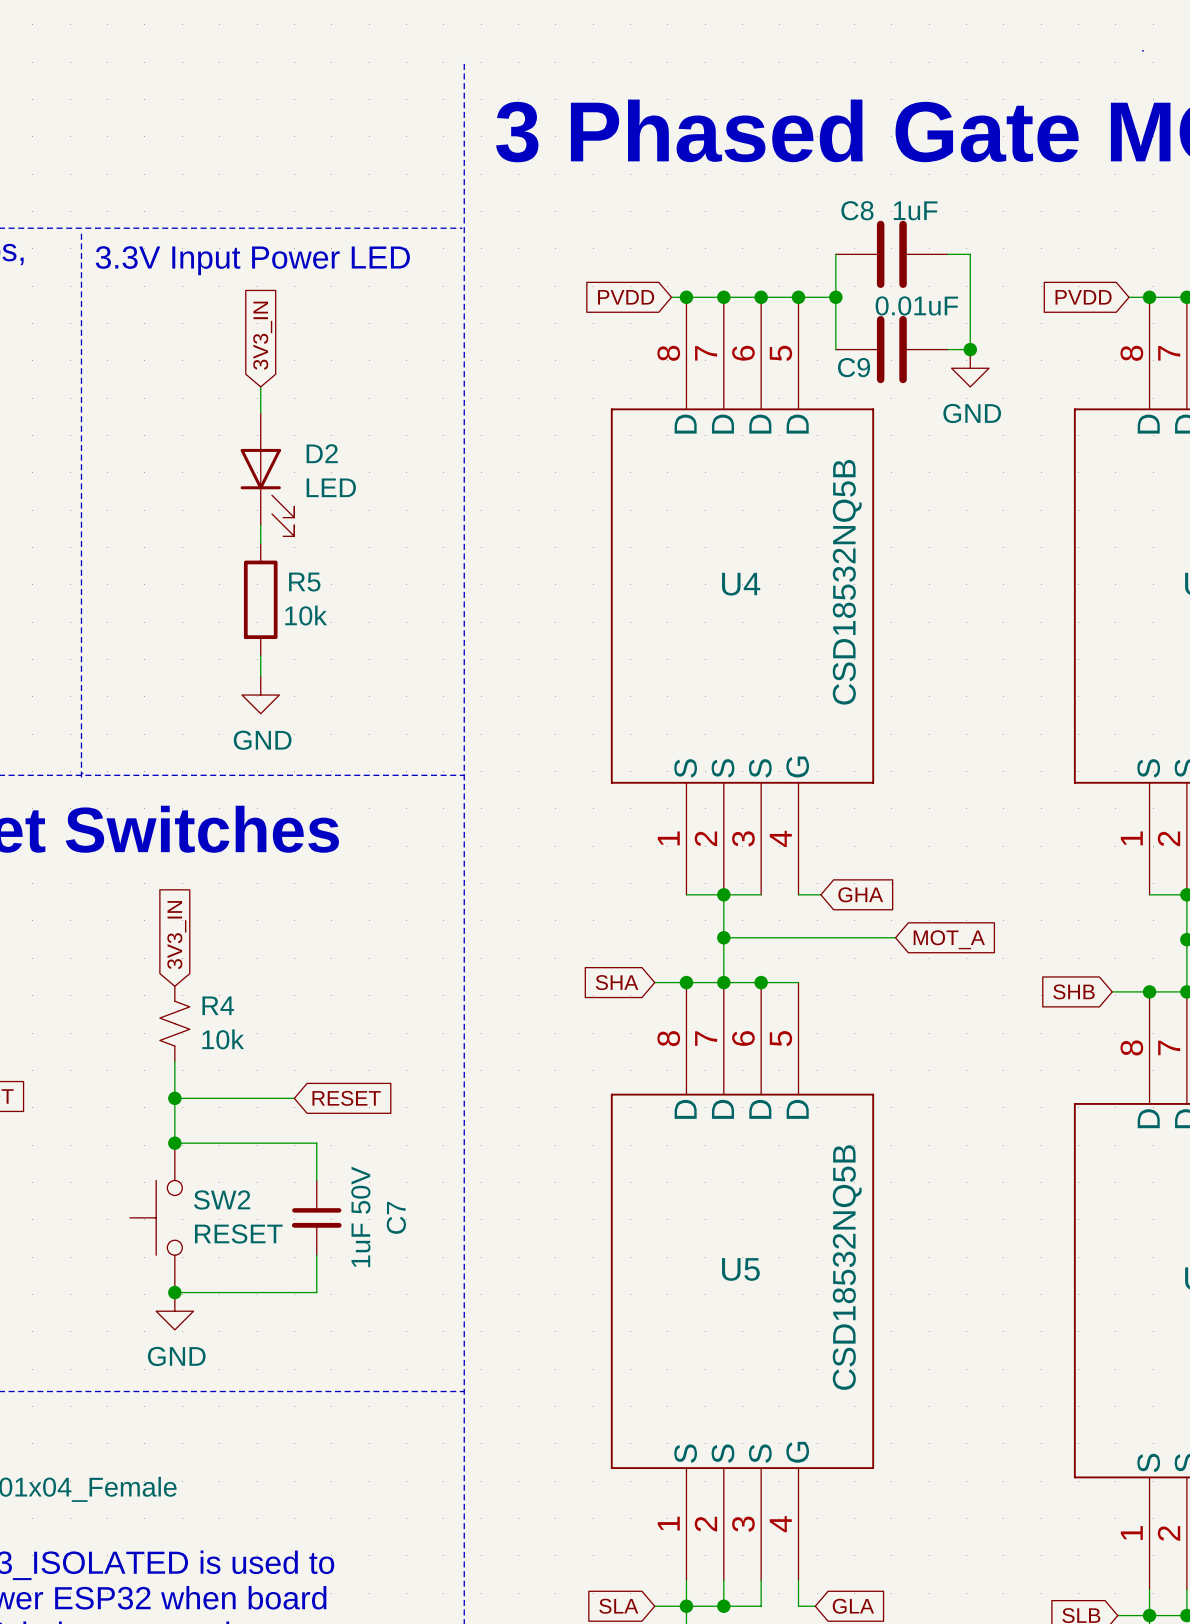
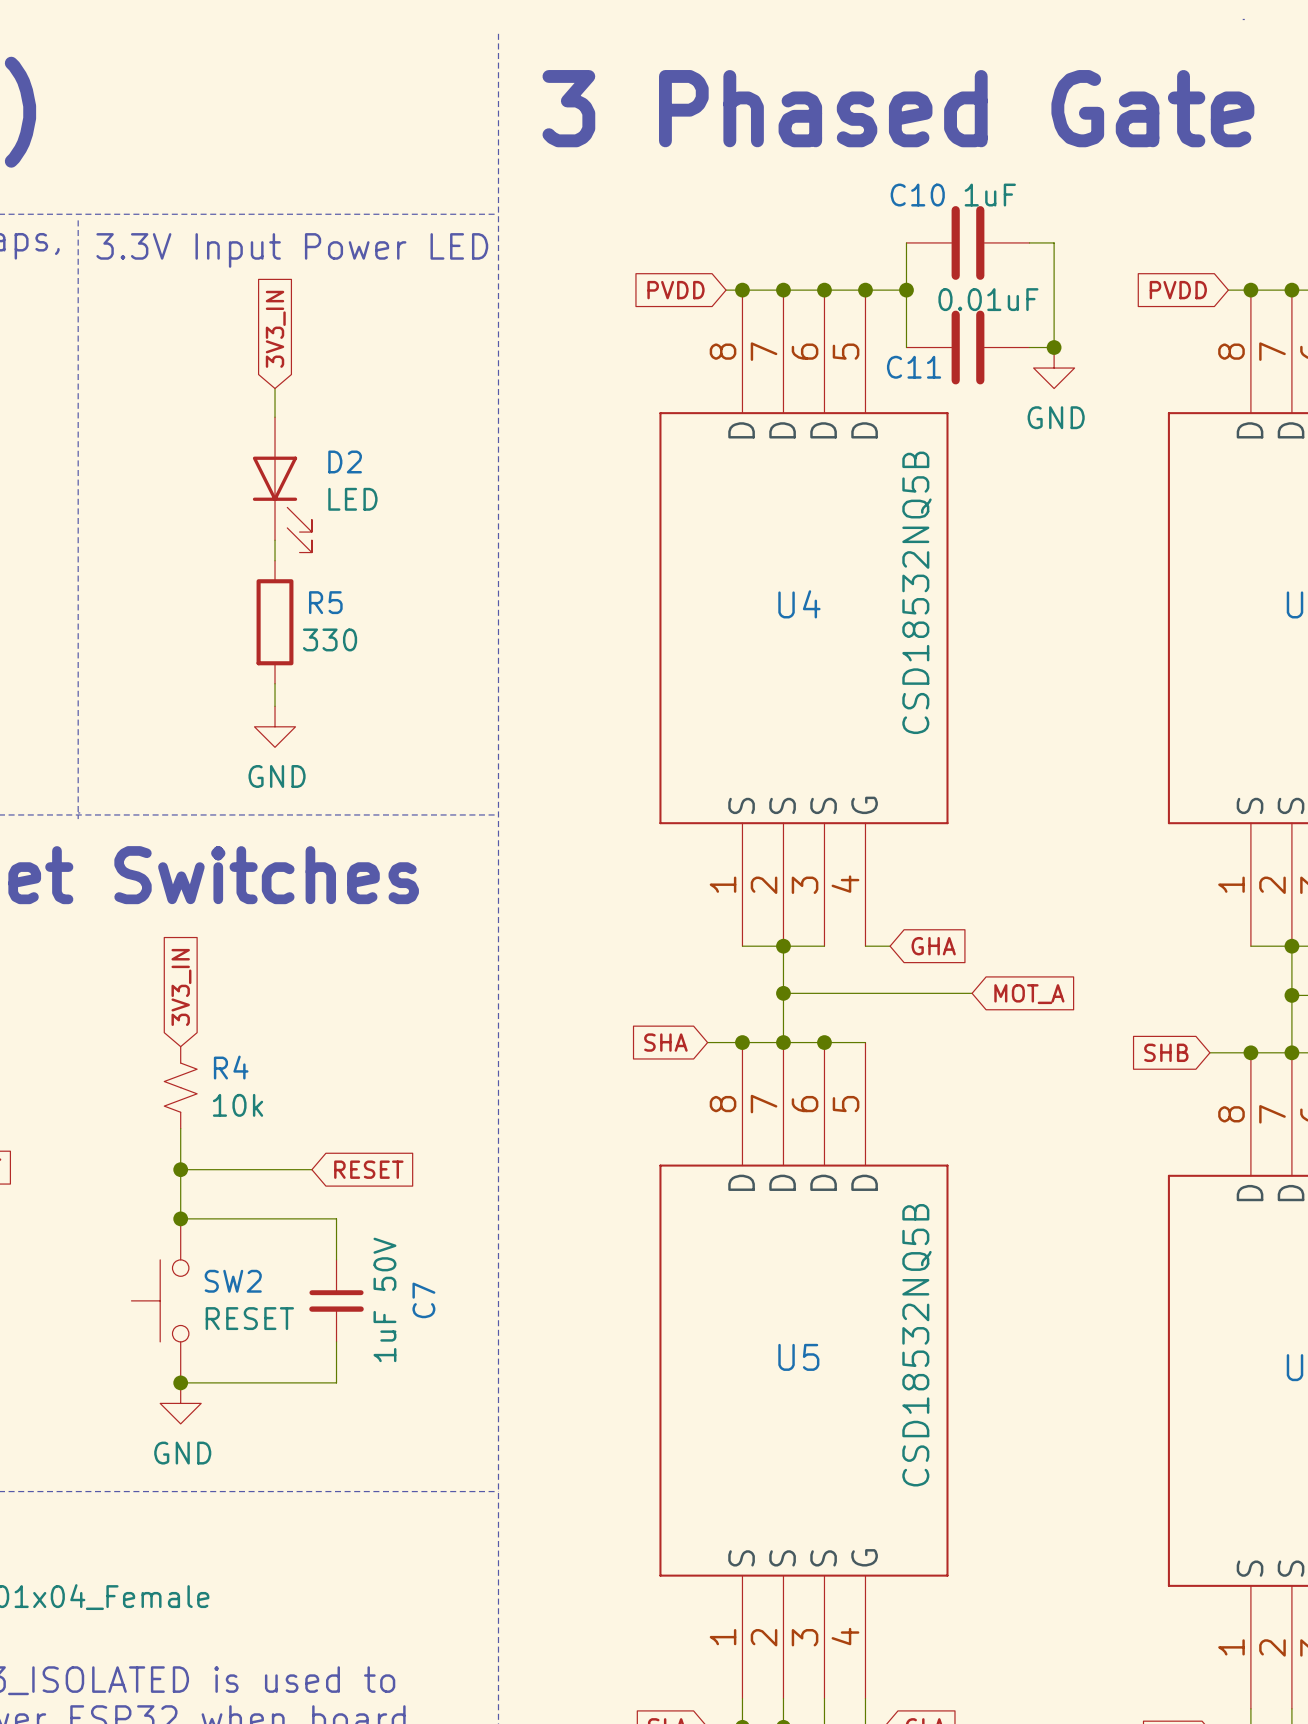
C8 name: C8 (857, 210) -> C10 (917, 195)
C9 name: C9 (854, 367) -> C11 (914, 367)
R5 value: 10k (306, 615) -> 330 (330, 639)

